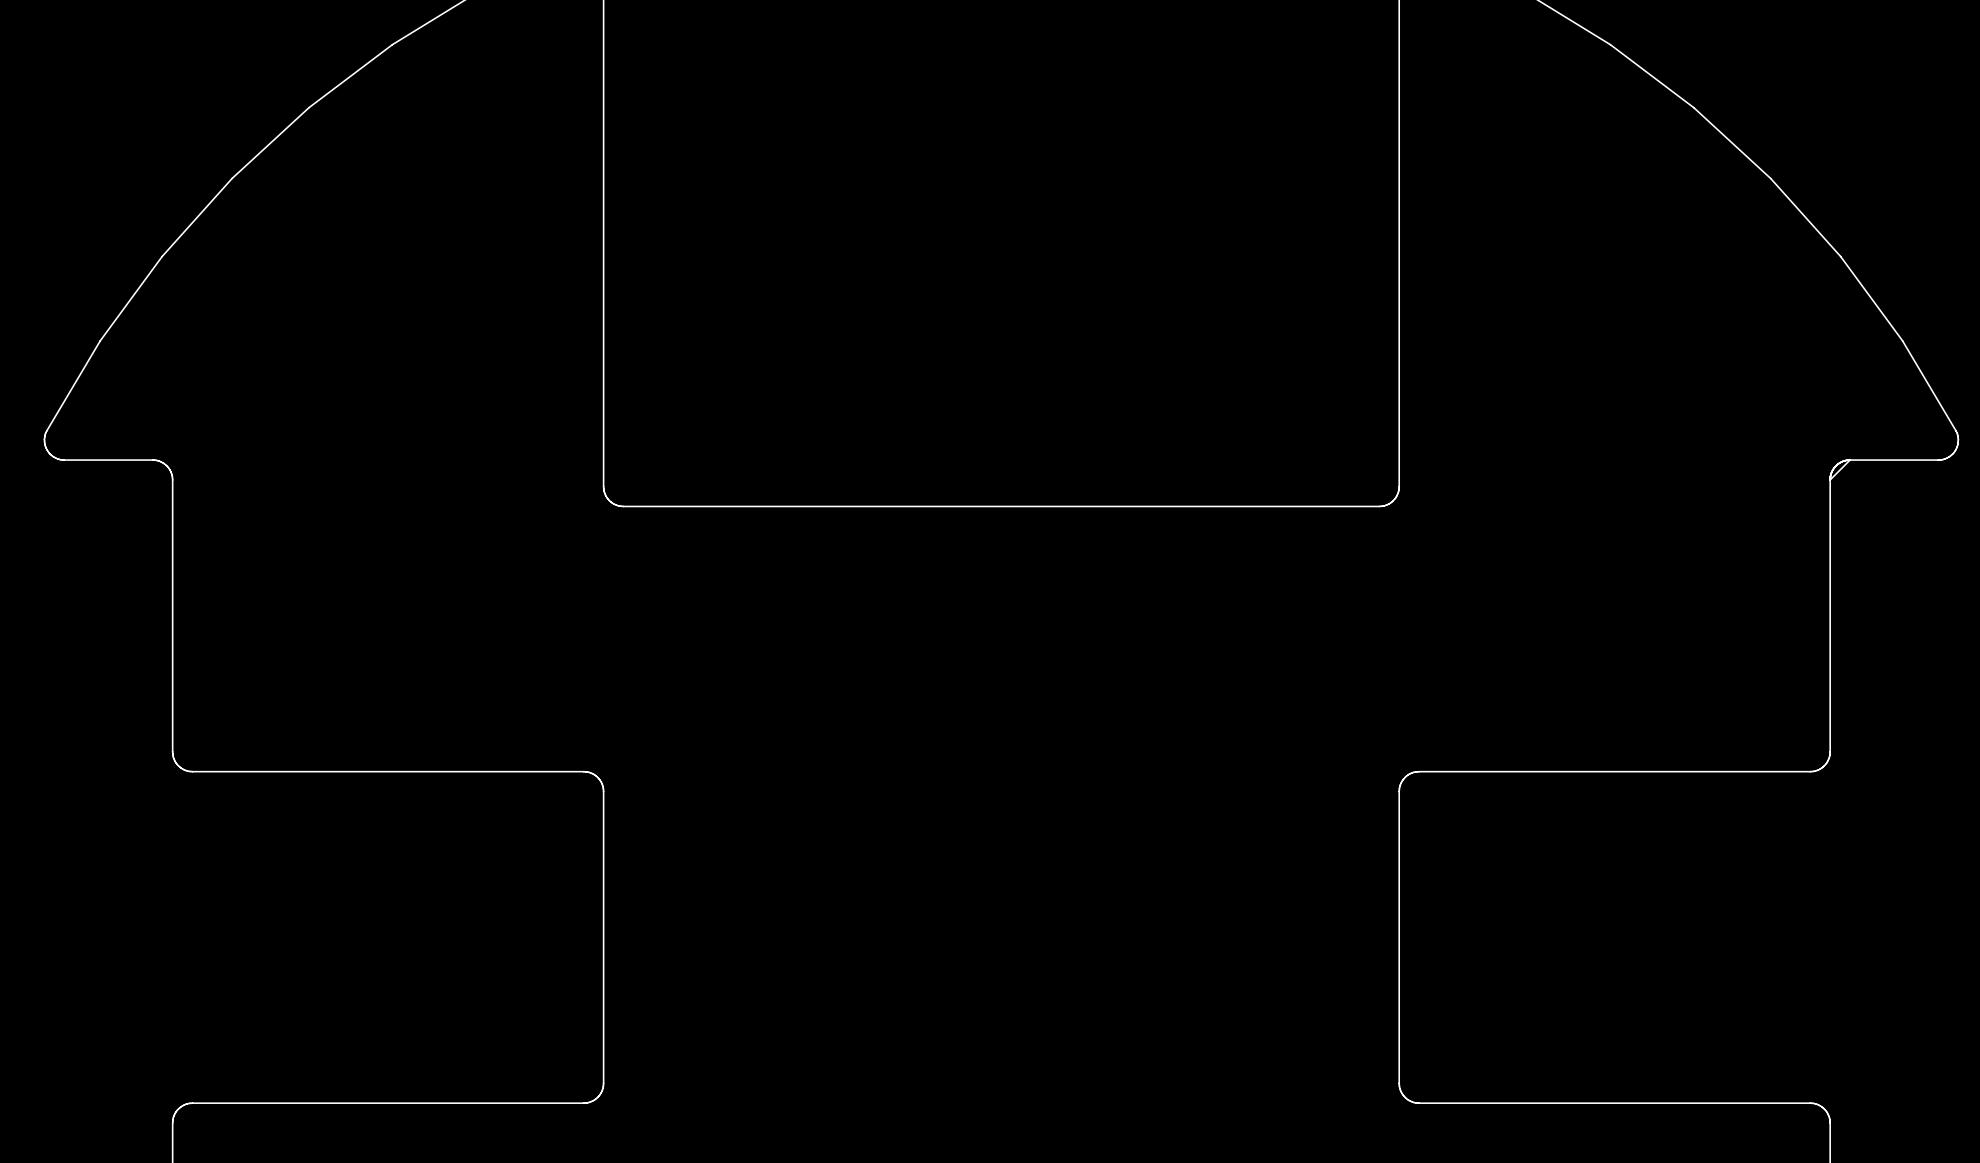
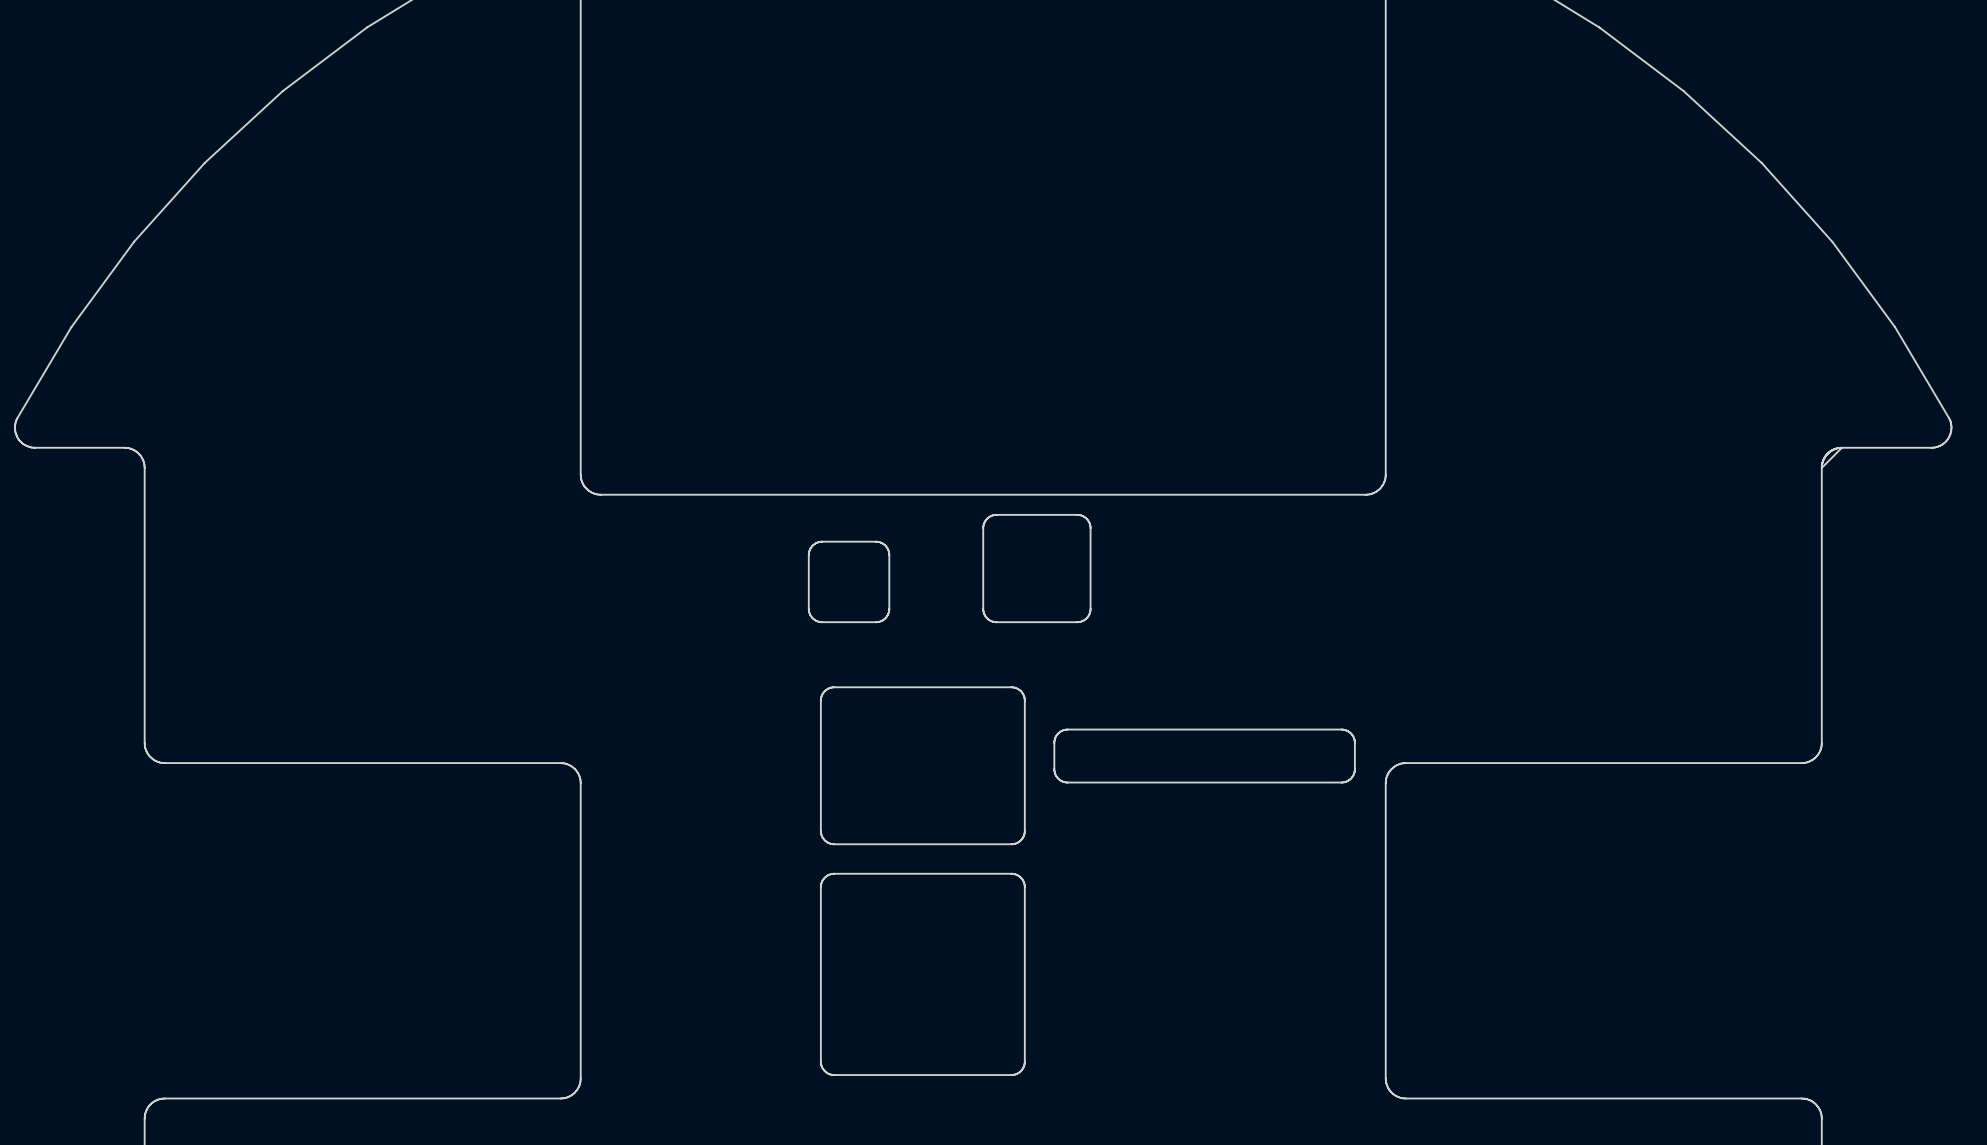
board edge: none -> (995, 514) (1078, 514) (1086, 518) (1090, 527) (1090, 609) (1086, 618) (1078, 622) (995, 622) (987, 618) (983, 609) (983, 527) (987, 518) (995, 514)
board edge: none -> (821, 541) (877, 541) (886, 546) (889, 553) (889, 609) (884, 619) (877, 622) (821, 622) (811, 617) (808, 609) (808, 553) (812, 545) (821, 541)
board edge: none -> (833, 687) (1012, 687) (1019, 690) (1024, 699) (1024, 832) (1021, 839) (1012, 844) (833, 844) (825, 841) (820, 832) (820, 699) (824, 691) (833, 687)
board edge: none -> (1066, 729) (1342, 729) (1350, 732) (1354, 739) (1354, 770) (1350, 778) (1342, 782) (1066, 782) (1058, 778) (1054, 770) (1054, 739) (1059, 732) (1066, 729)
board edge: none -> (833, 873) (1012, 873) (1020, 877) (1024, 885) (1024, 1062) (1020, 1071) (1012, 1075) (833, 1075) (824, 1071) (820, 1062) (820, 885) (824, 877) (833, 873)

